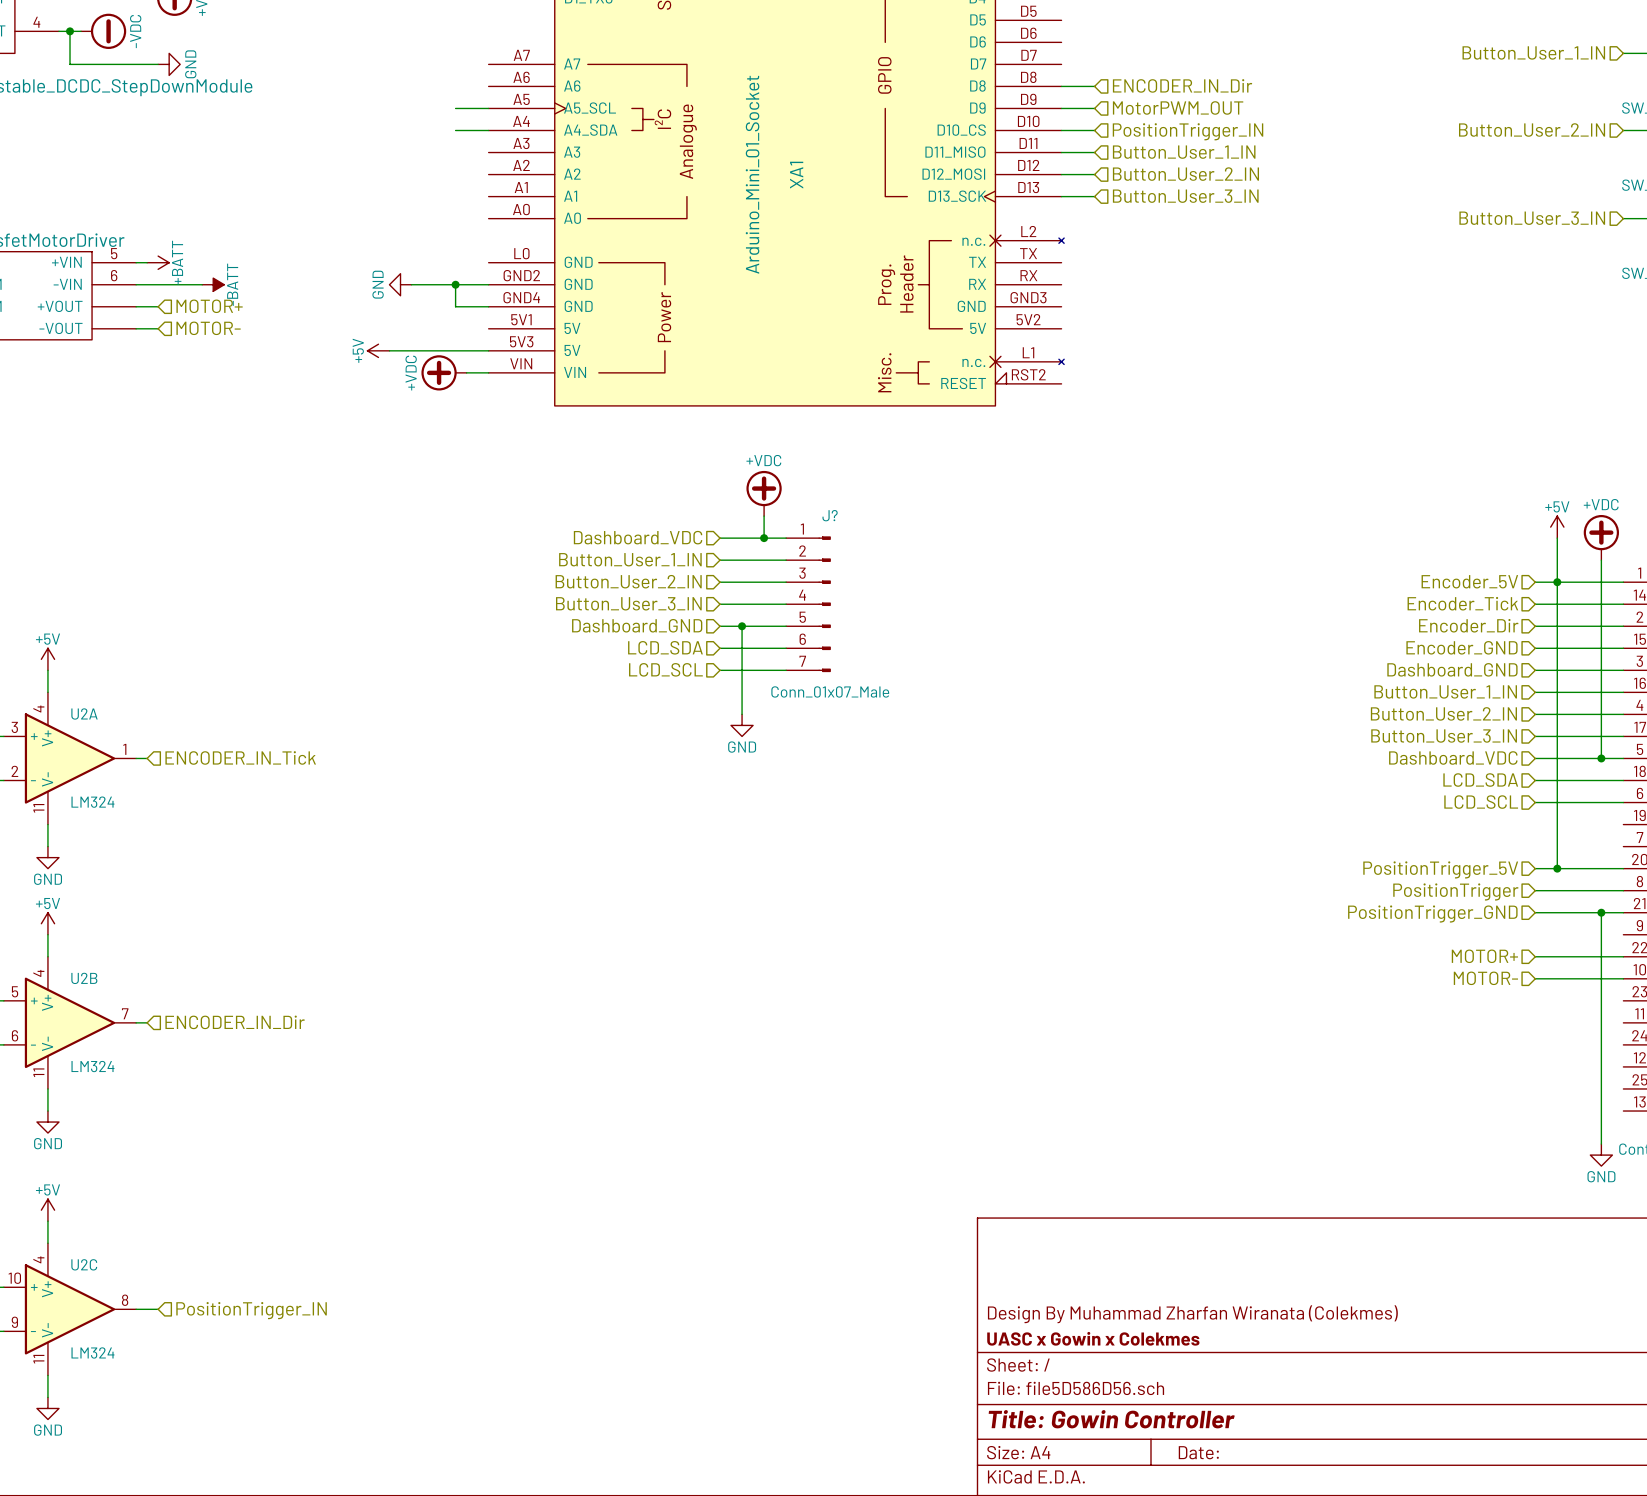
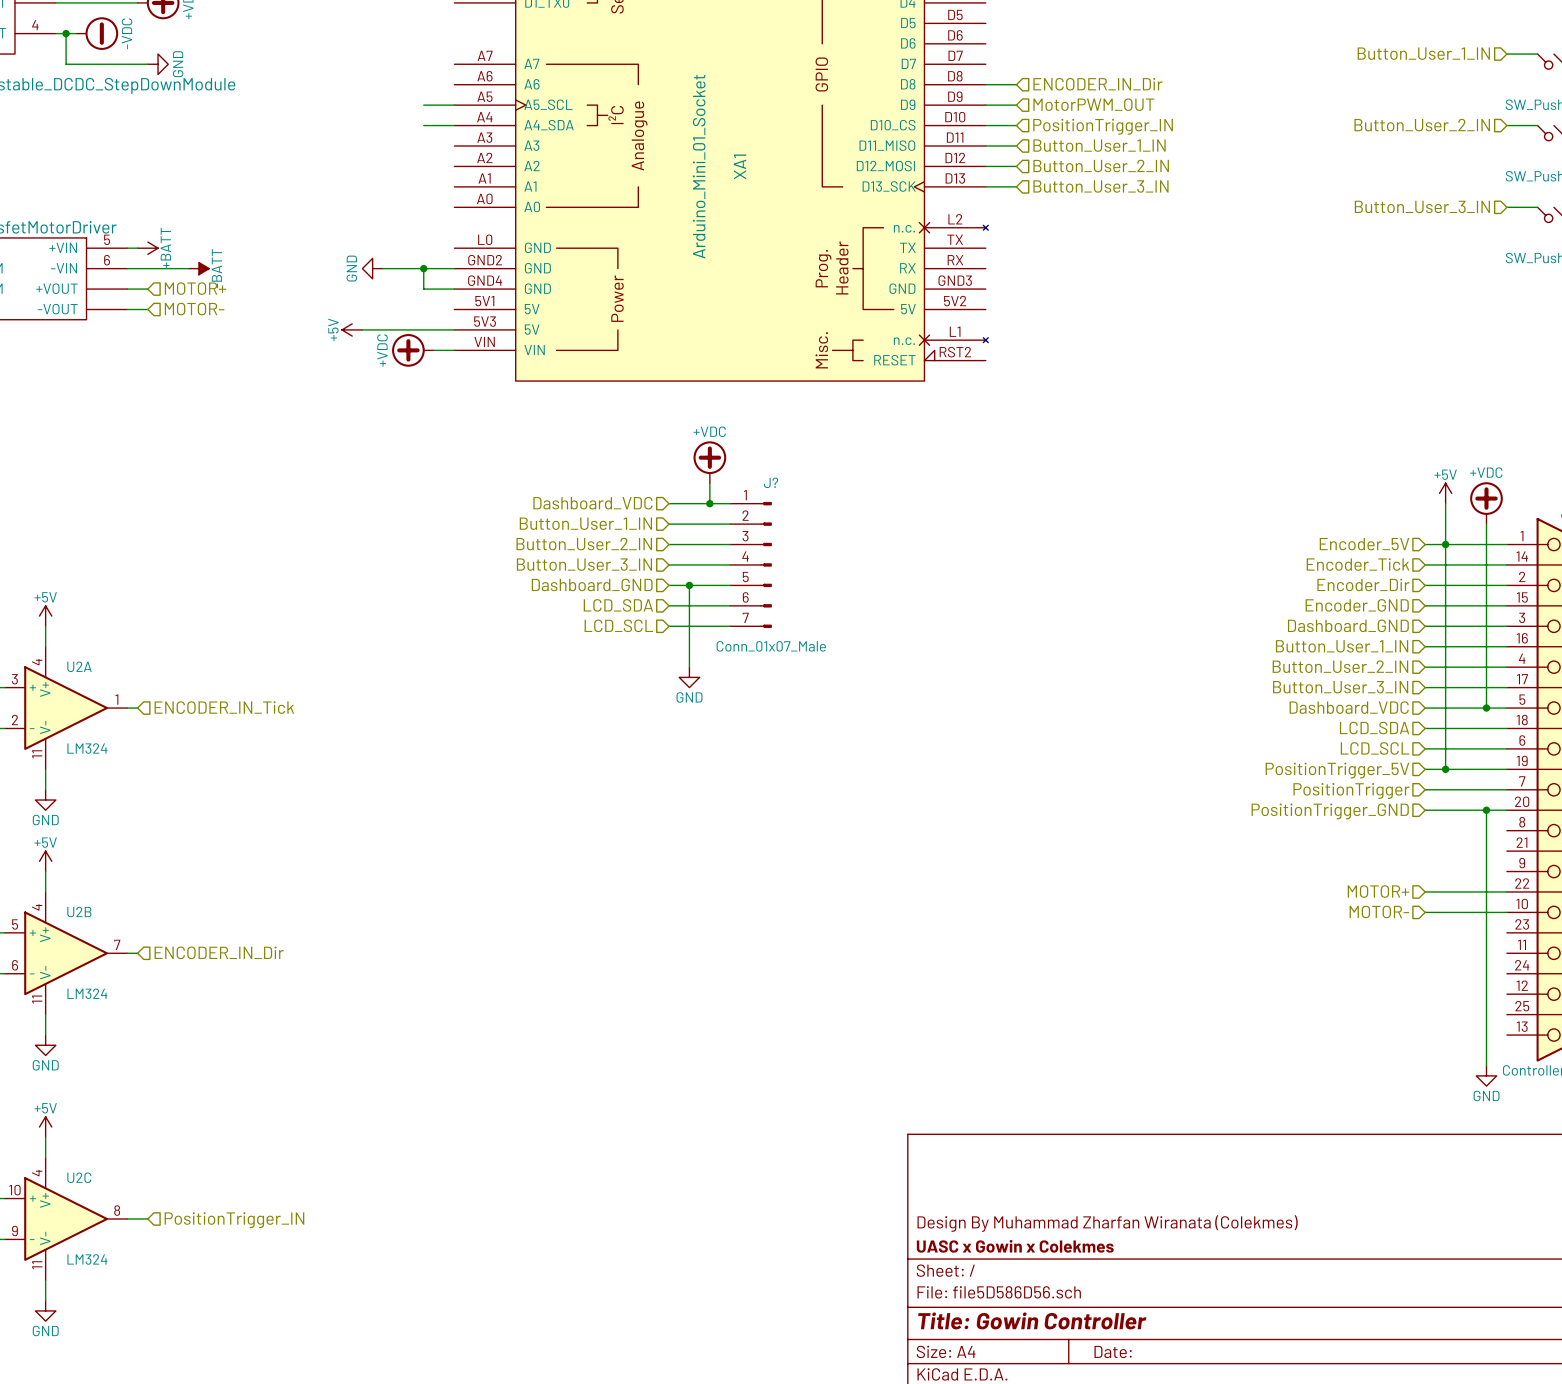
wire: (1557, 824) (1557, 868) -> (1486, 810) (1486, 851)
junction: none -> (1445, 769)
hierarchical label: none -> PositionTrigger_5V (1337, 770)
junction: (1557, 868) -> none
junction: none -> (1486, 810)
hierarchical label: PositionTrigger_5V (1440, 869) -> PositionTrigger_GND (1330, 811)
wire: (1535, 890) (1623, 890) -> (1425, 789) (1506, 789)
hierarchical label position: PositionTrigger (1455, 891) -> PositionTrigger (1351, 790)
wire: (1535, 912) (1623, 912) -> (1425, 769) (1506, 769)
junction: (1601, 912) -> none
hierarchical label: PositionTrigger_GND (1432, 914) -> none

